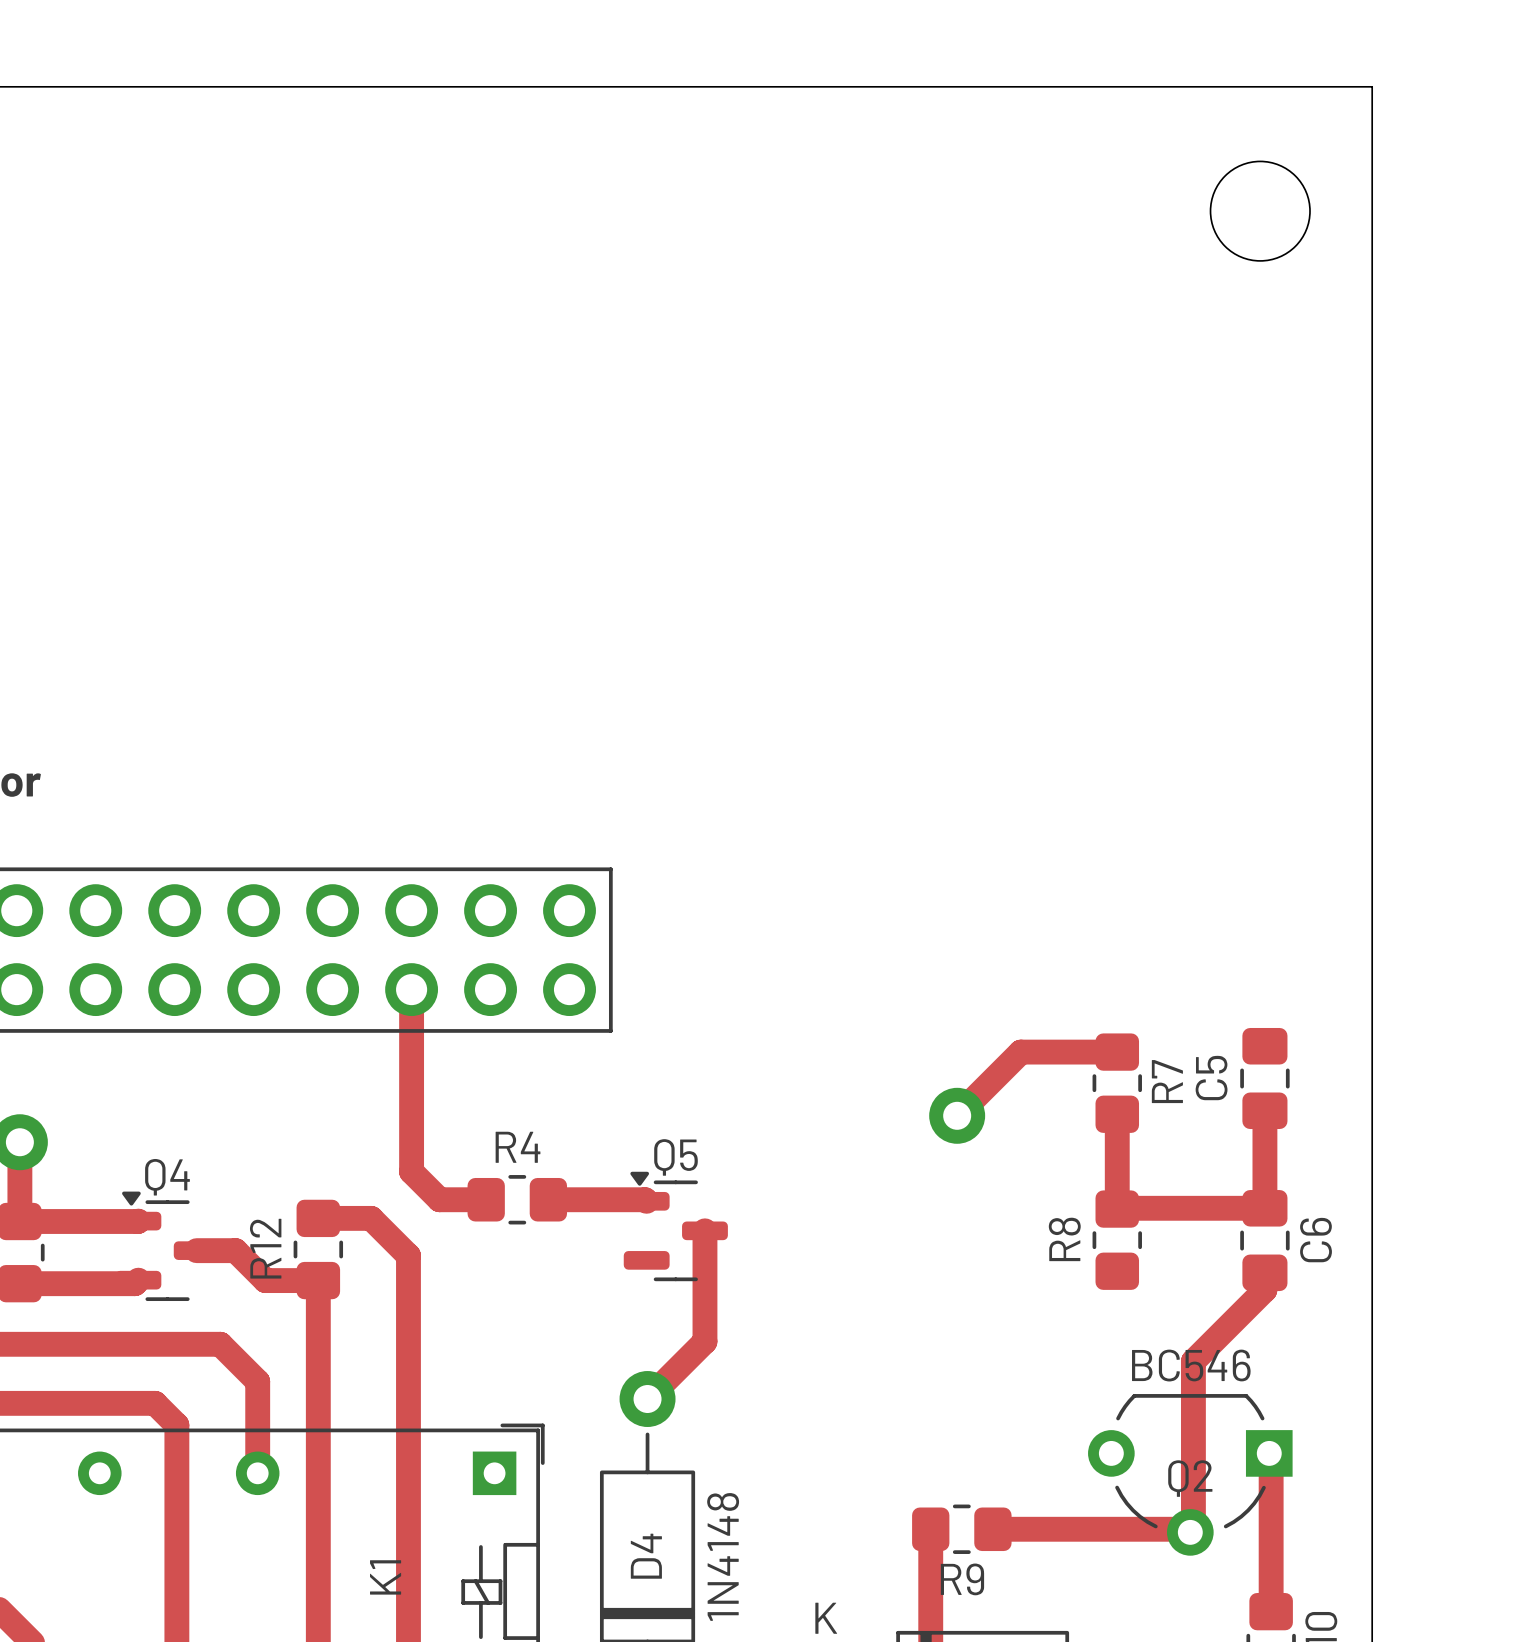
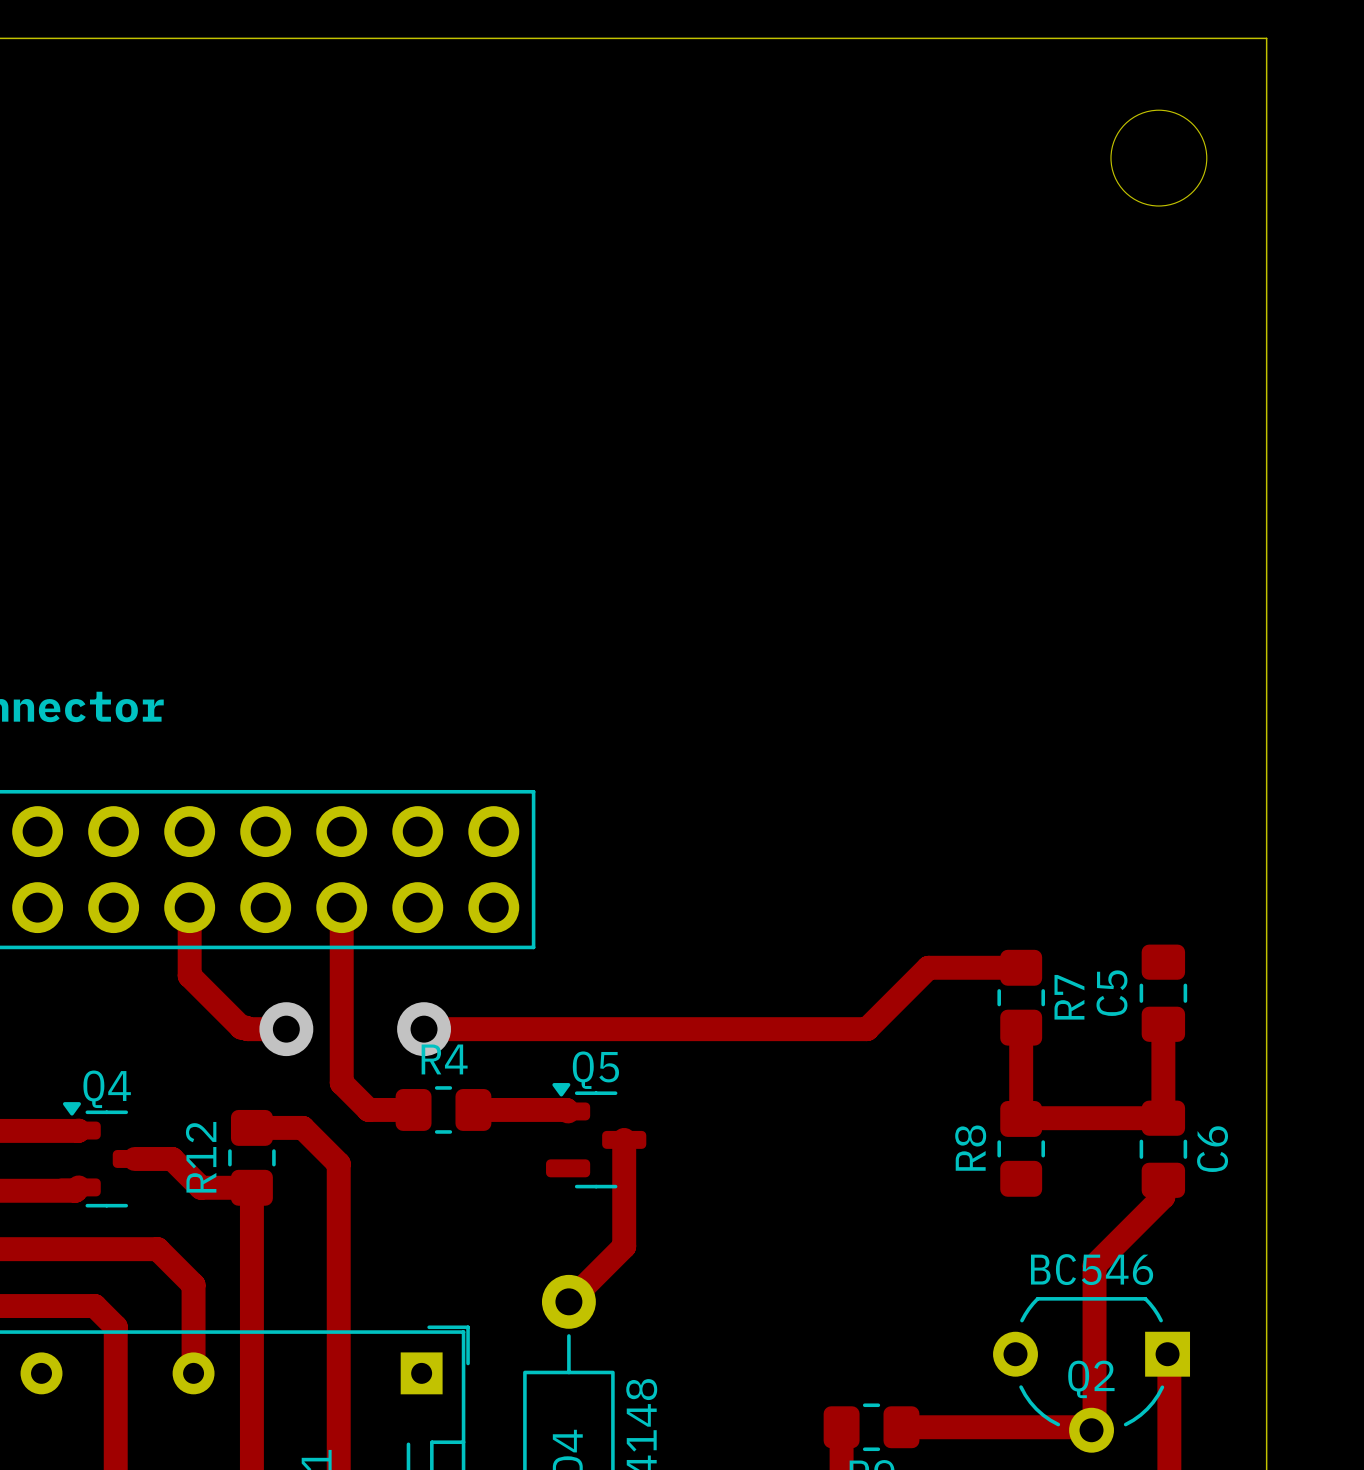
track: none -> (189, 907) (189, 975) (241, 1027) (286, 1029)
via: none -> (286, 1029)
track: none -> (424, 1029) (867, 1029)
via: none -> (424, 1029)
via: (957, 1115) -> none

